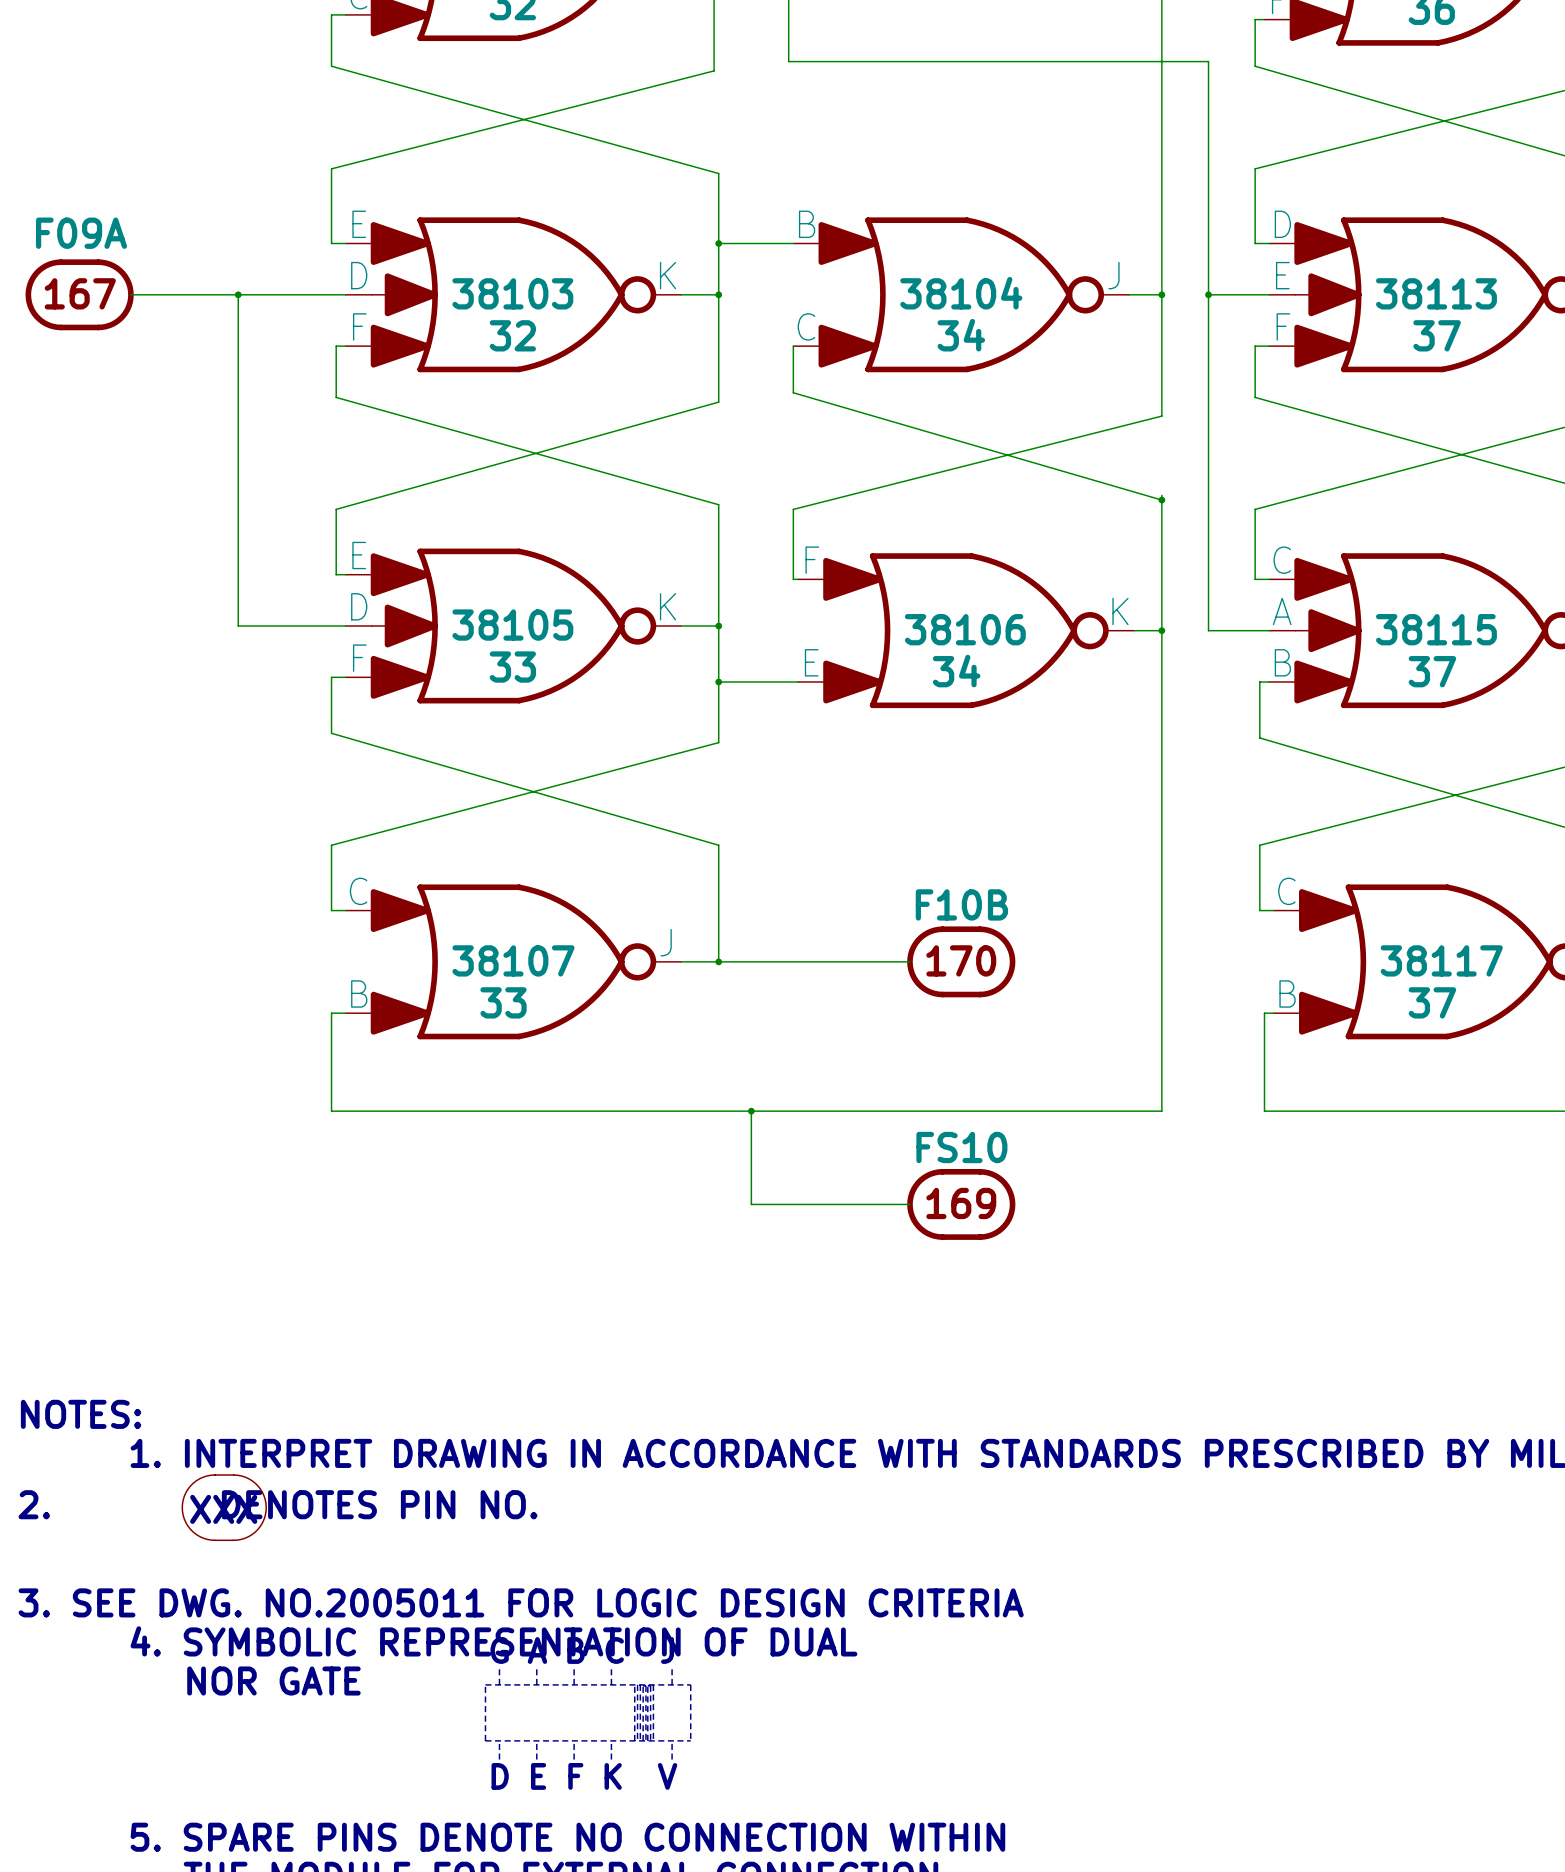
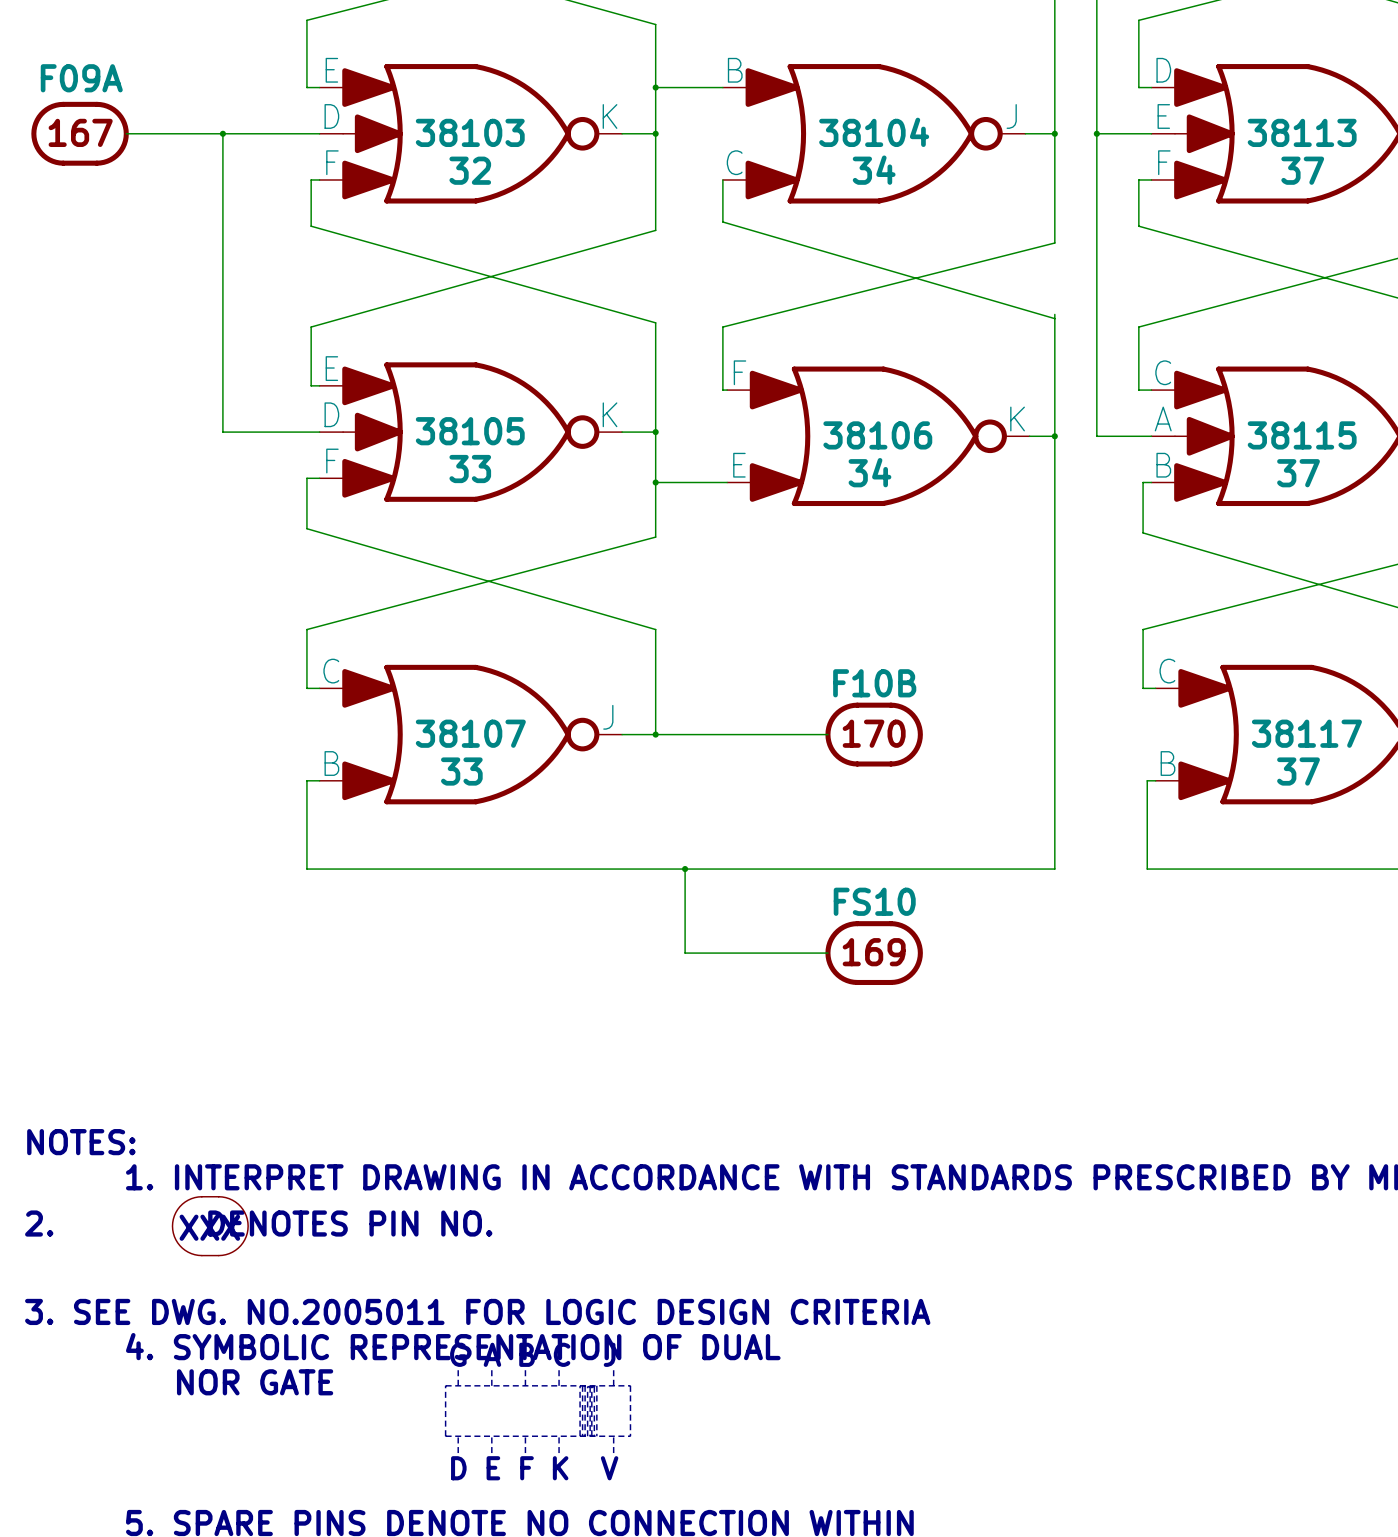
junction: (1161, 500) -> none

